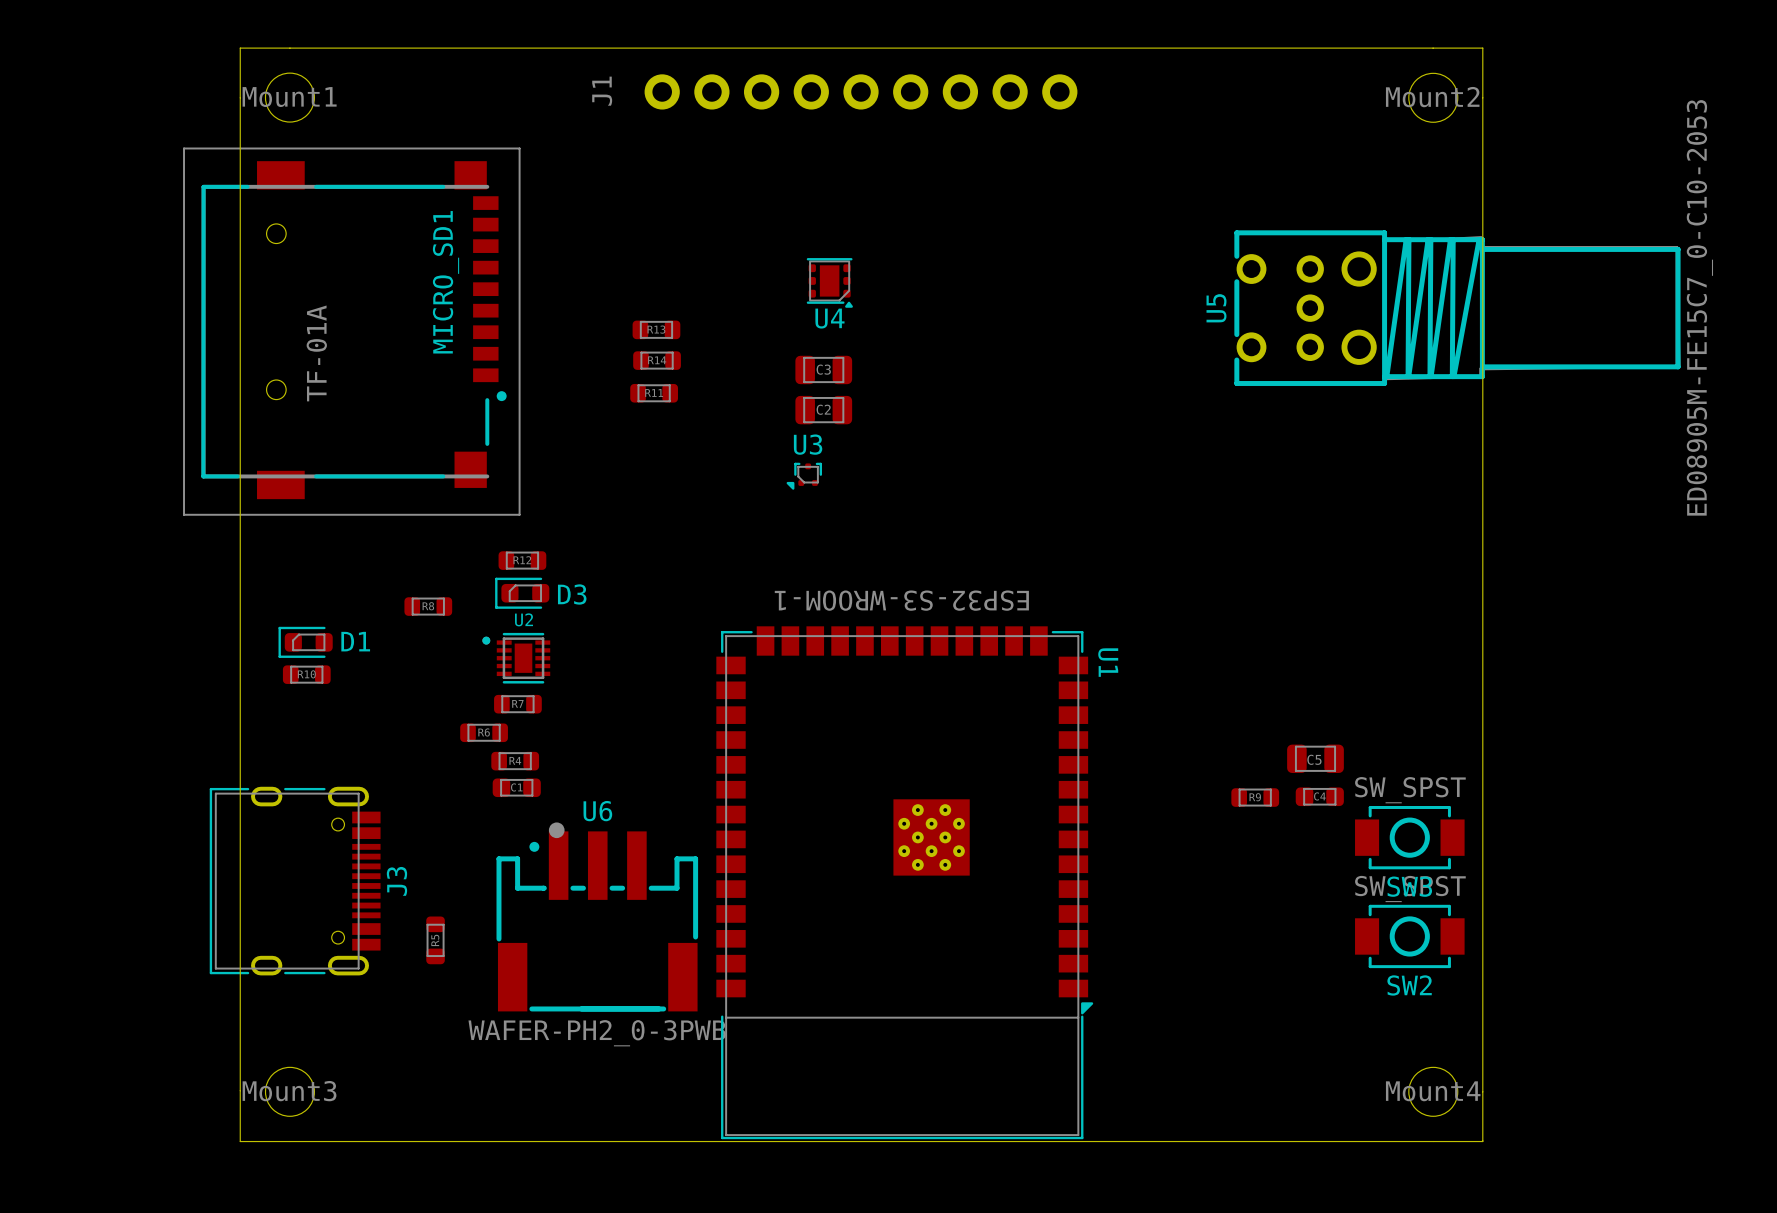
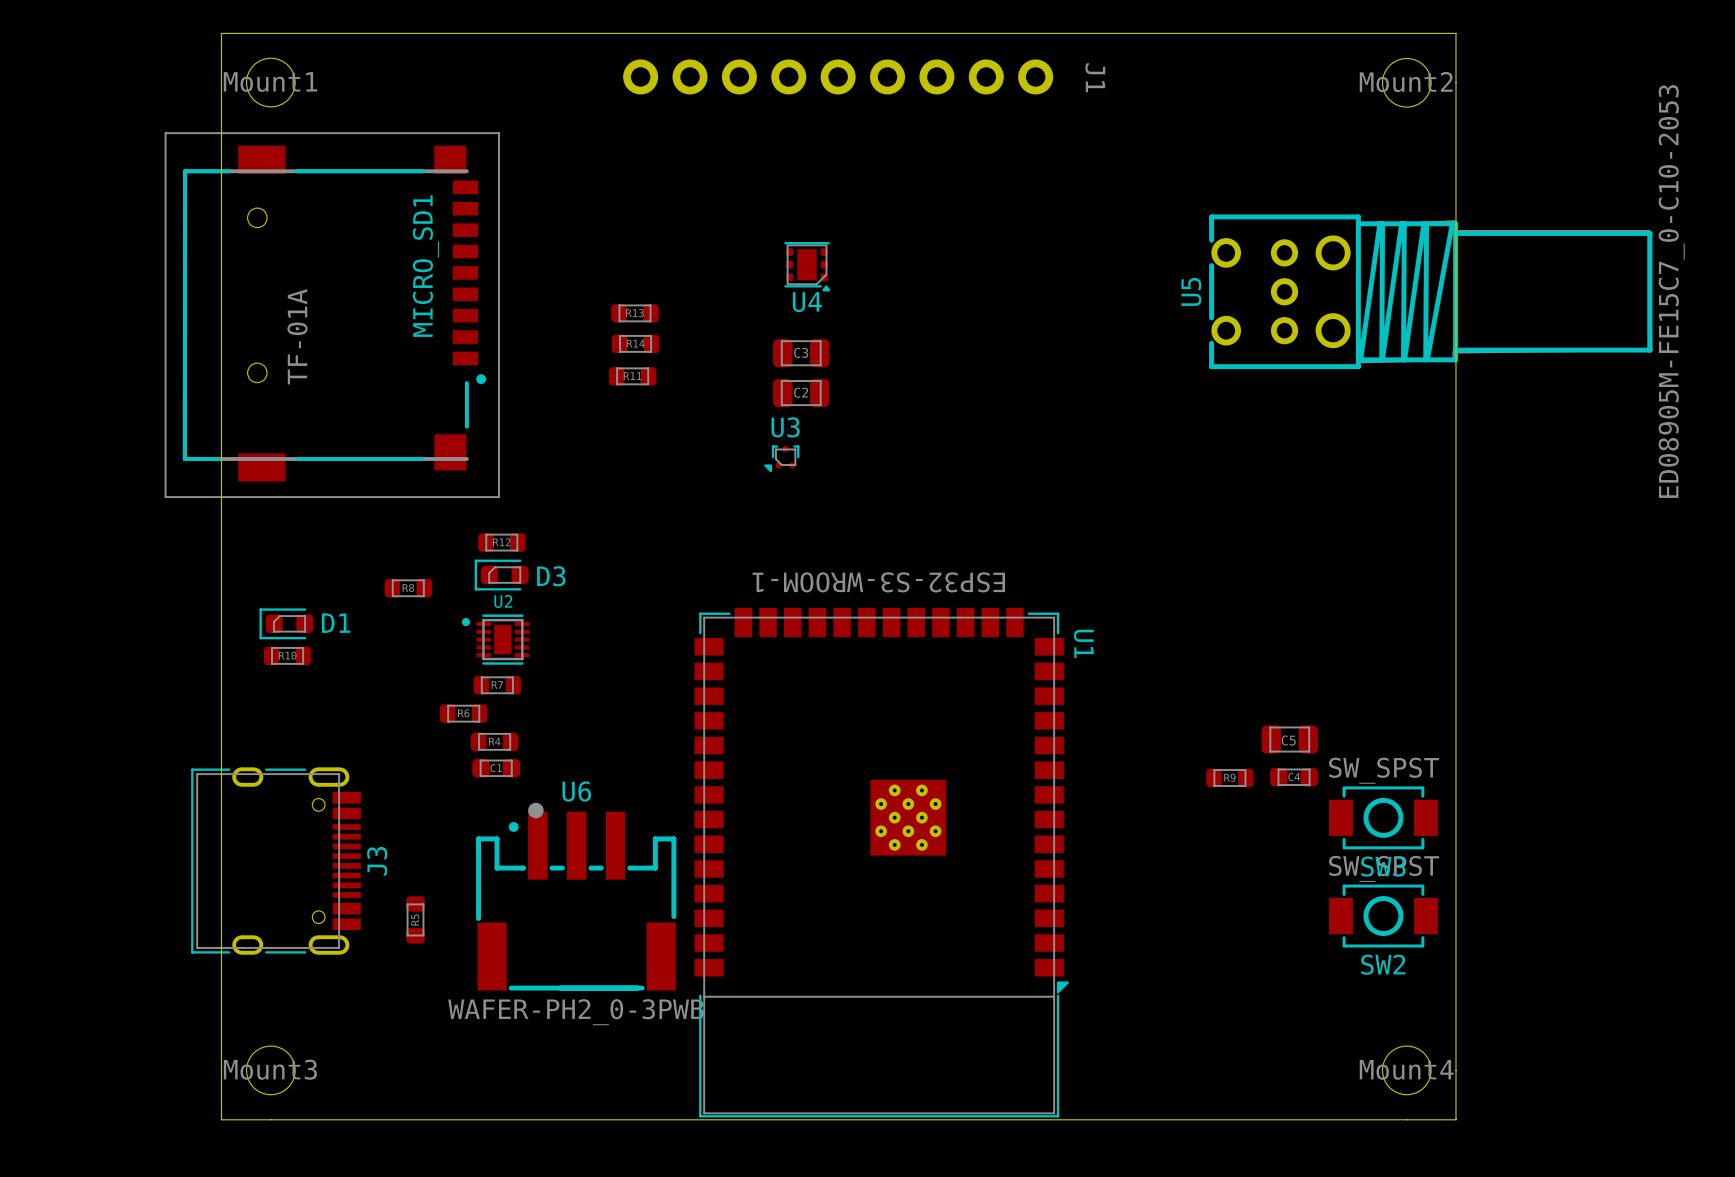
J1 name rotation: 0° (602, 91) -> 180° (1095, 77)
J1 name position: J1 (602, 91) -> J1 (1095, 77)

